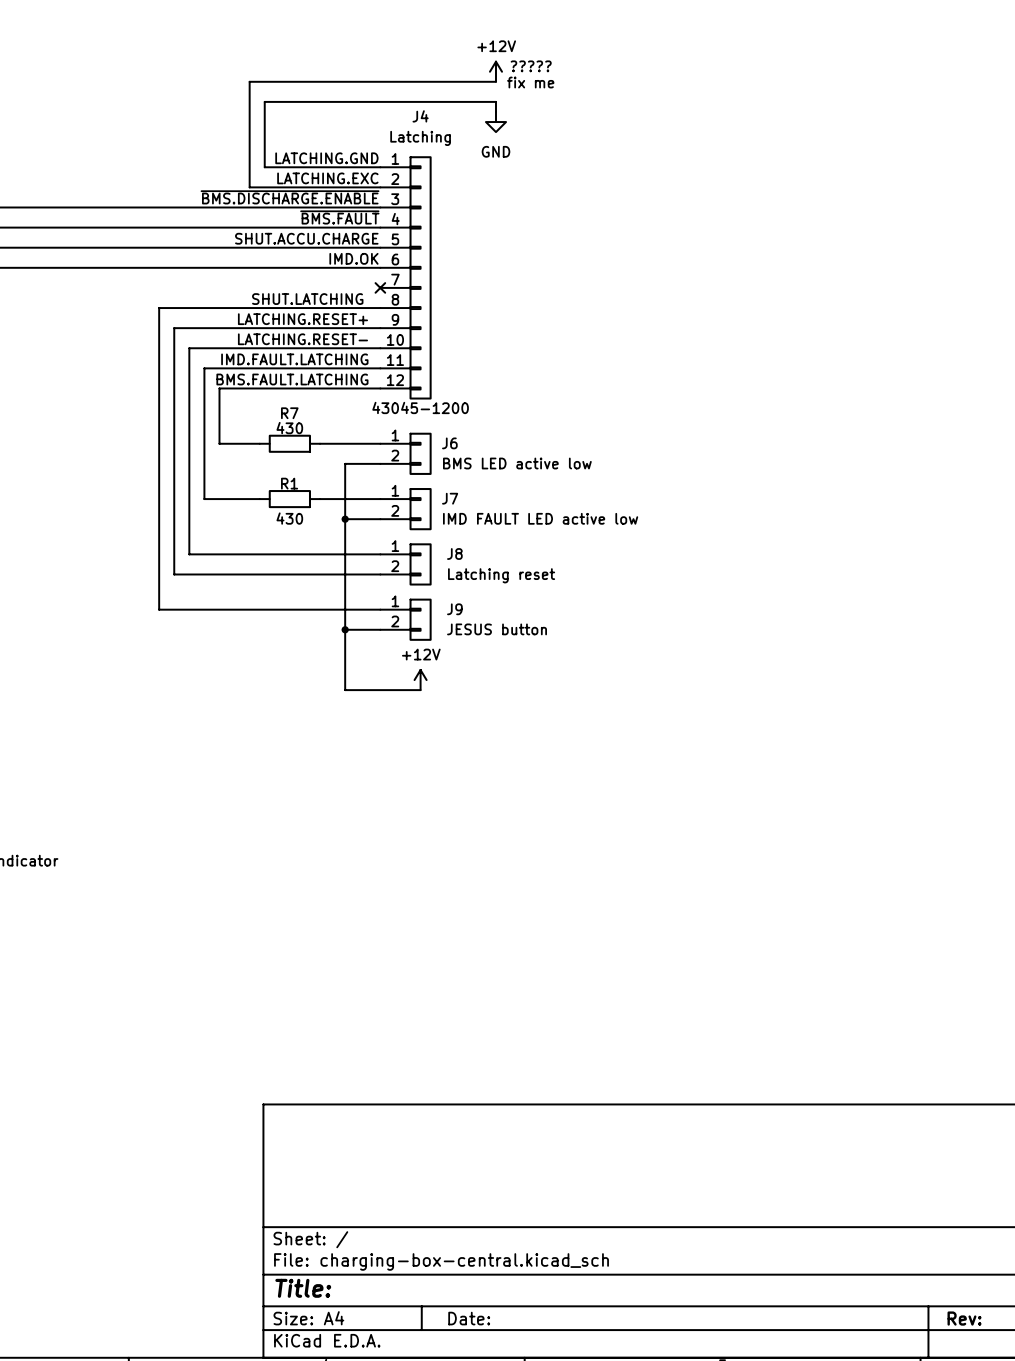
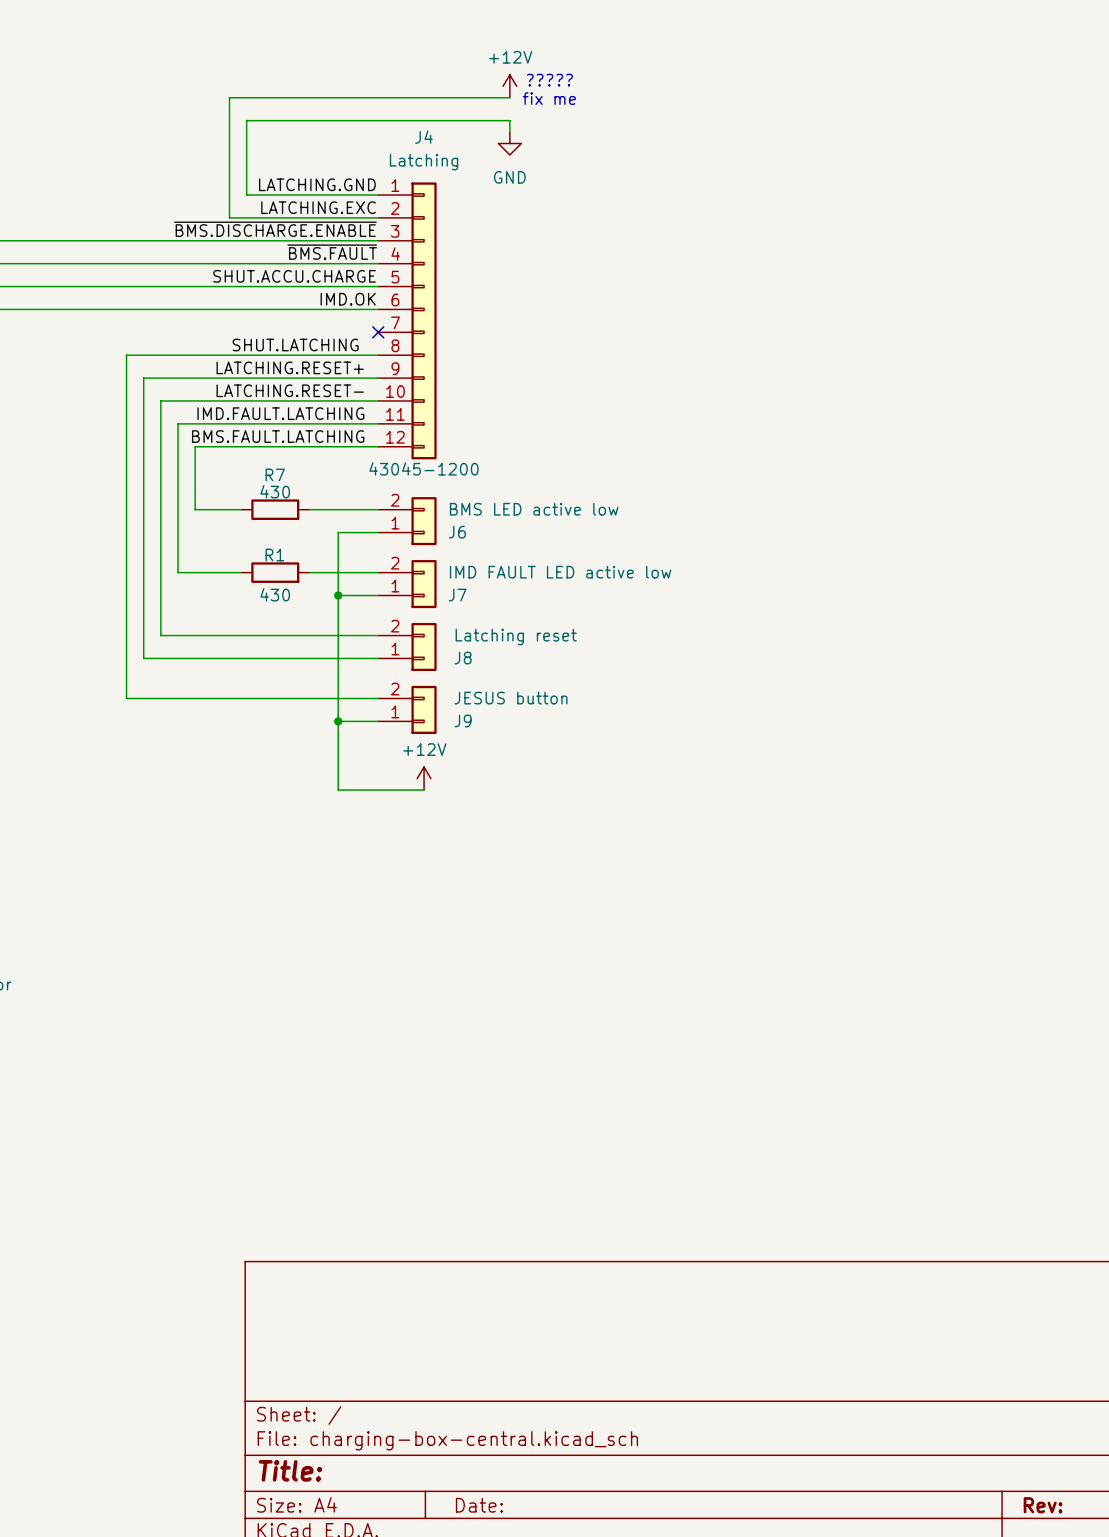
J6 flip: as is (420, 453) -> up-down (424, 521)
J7 flip: as is (420, 509) -> up-down (424, 584)
J8 flip: as is (420, 564) -> up-down (424, 647)
J9 flip: as is (420, 619) -> up-down (424, 709)

